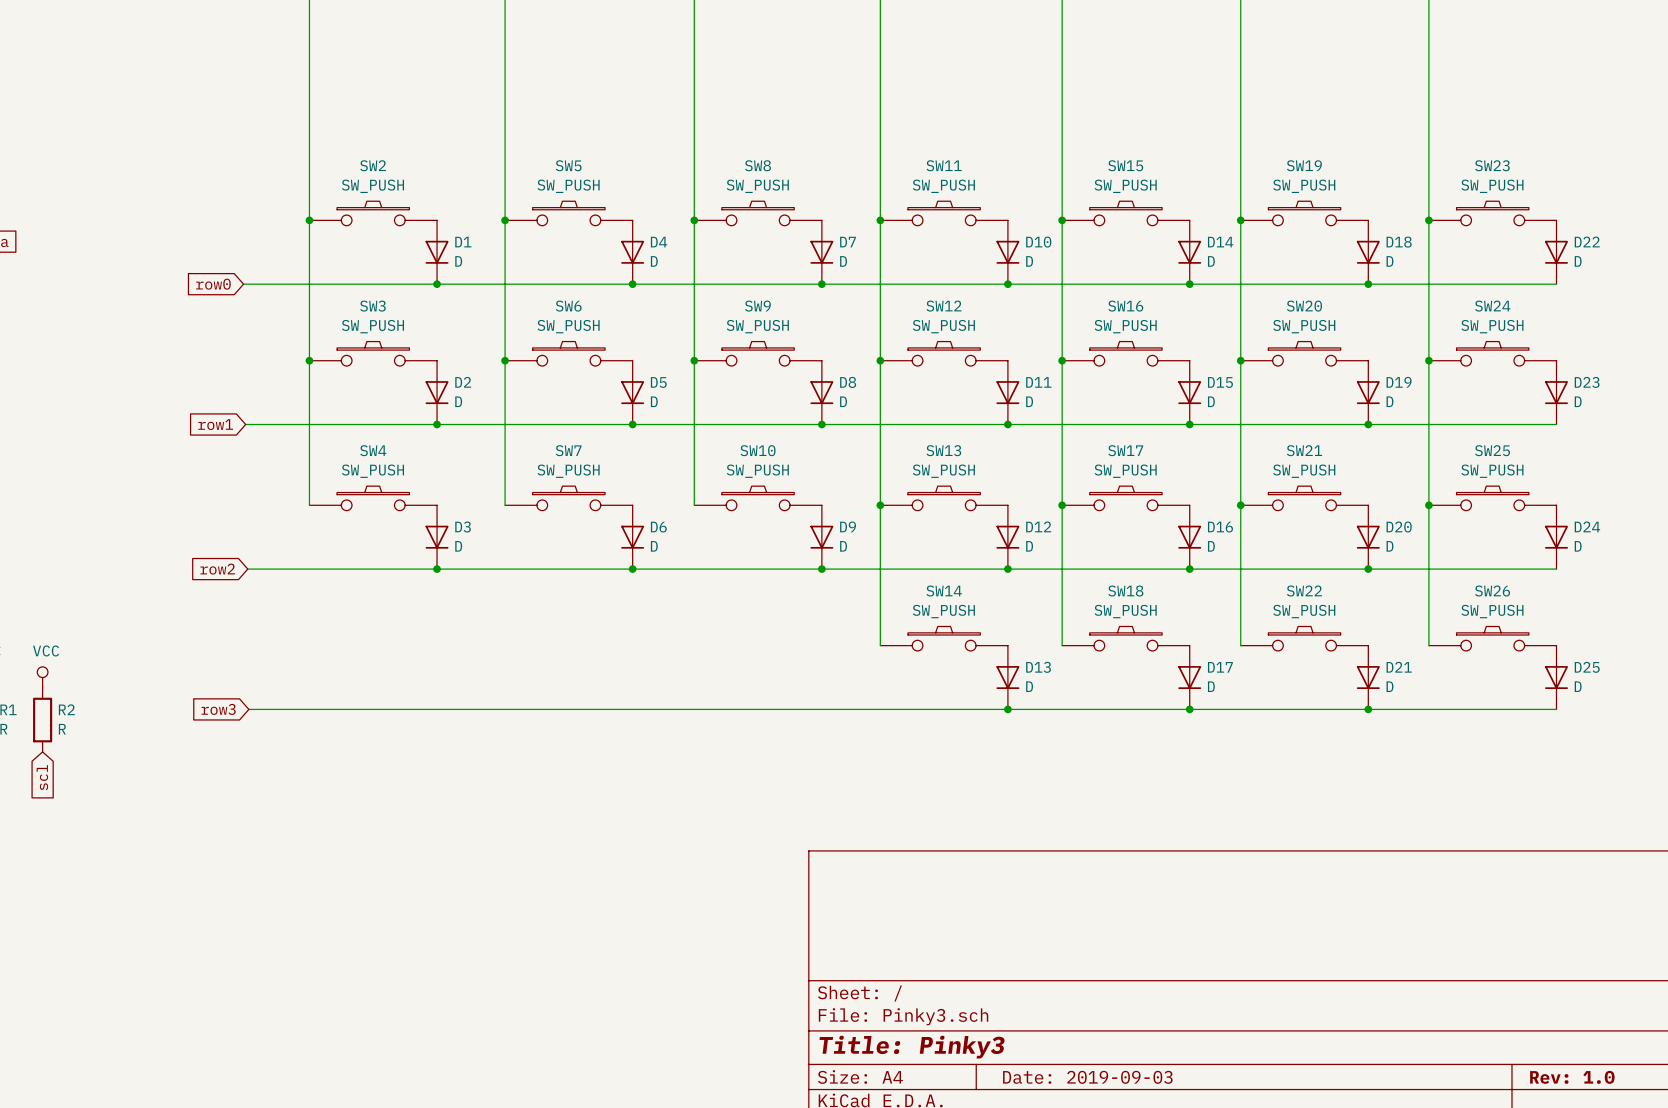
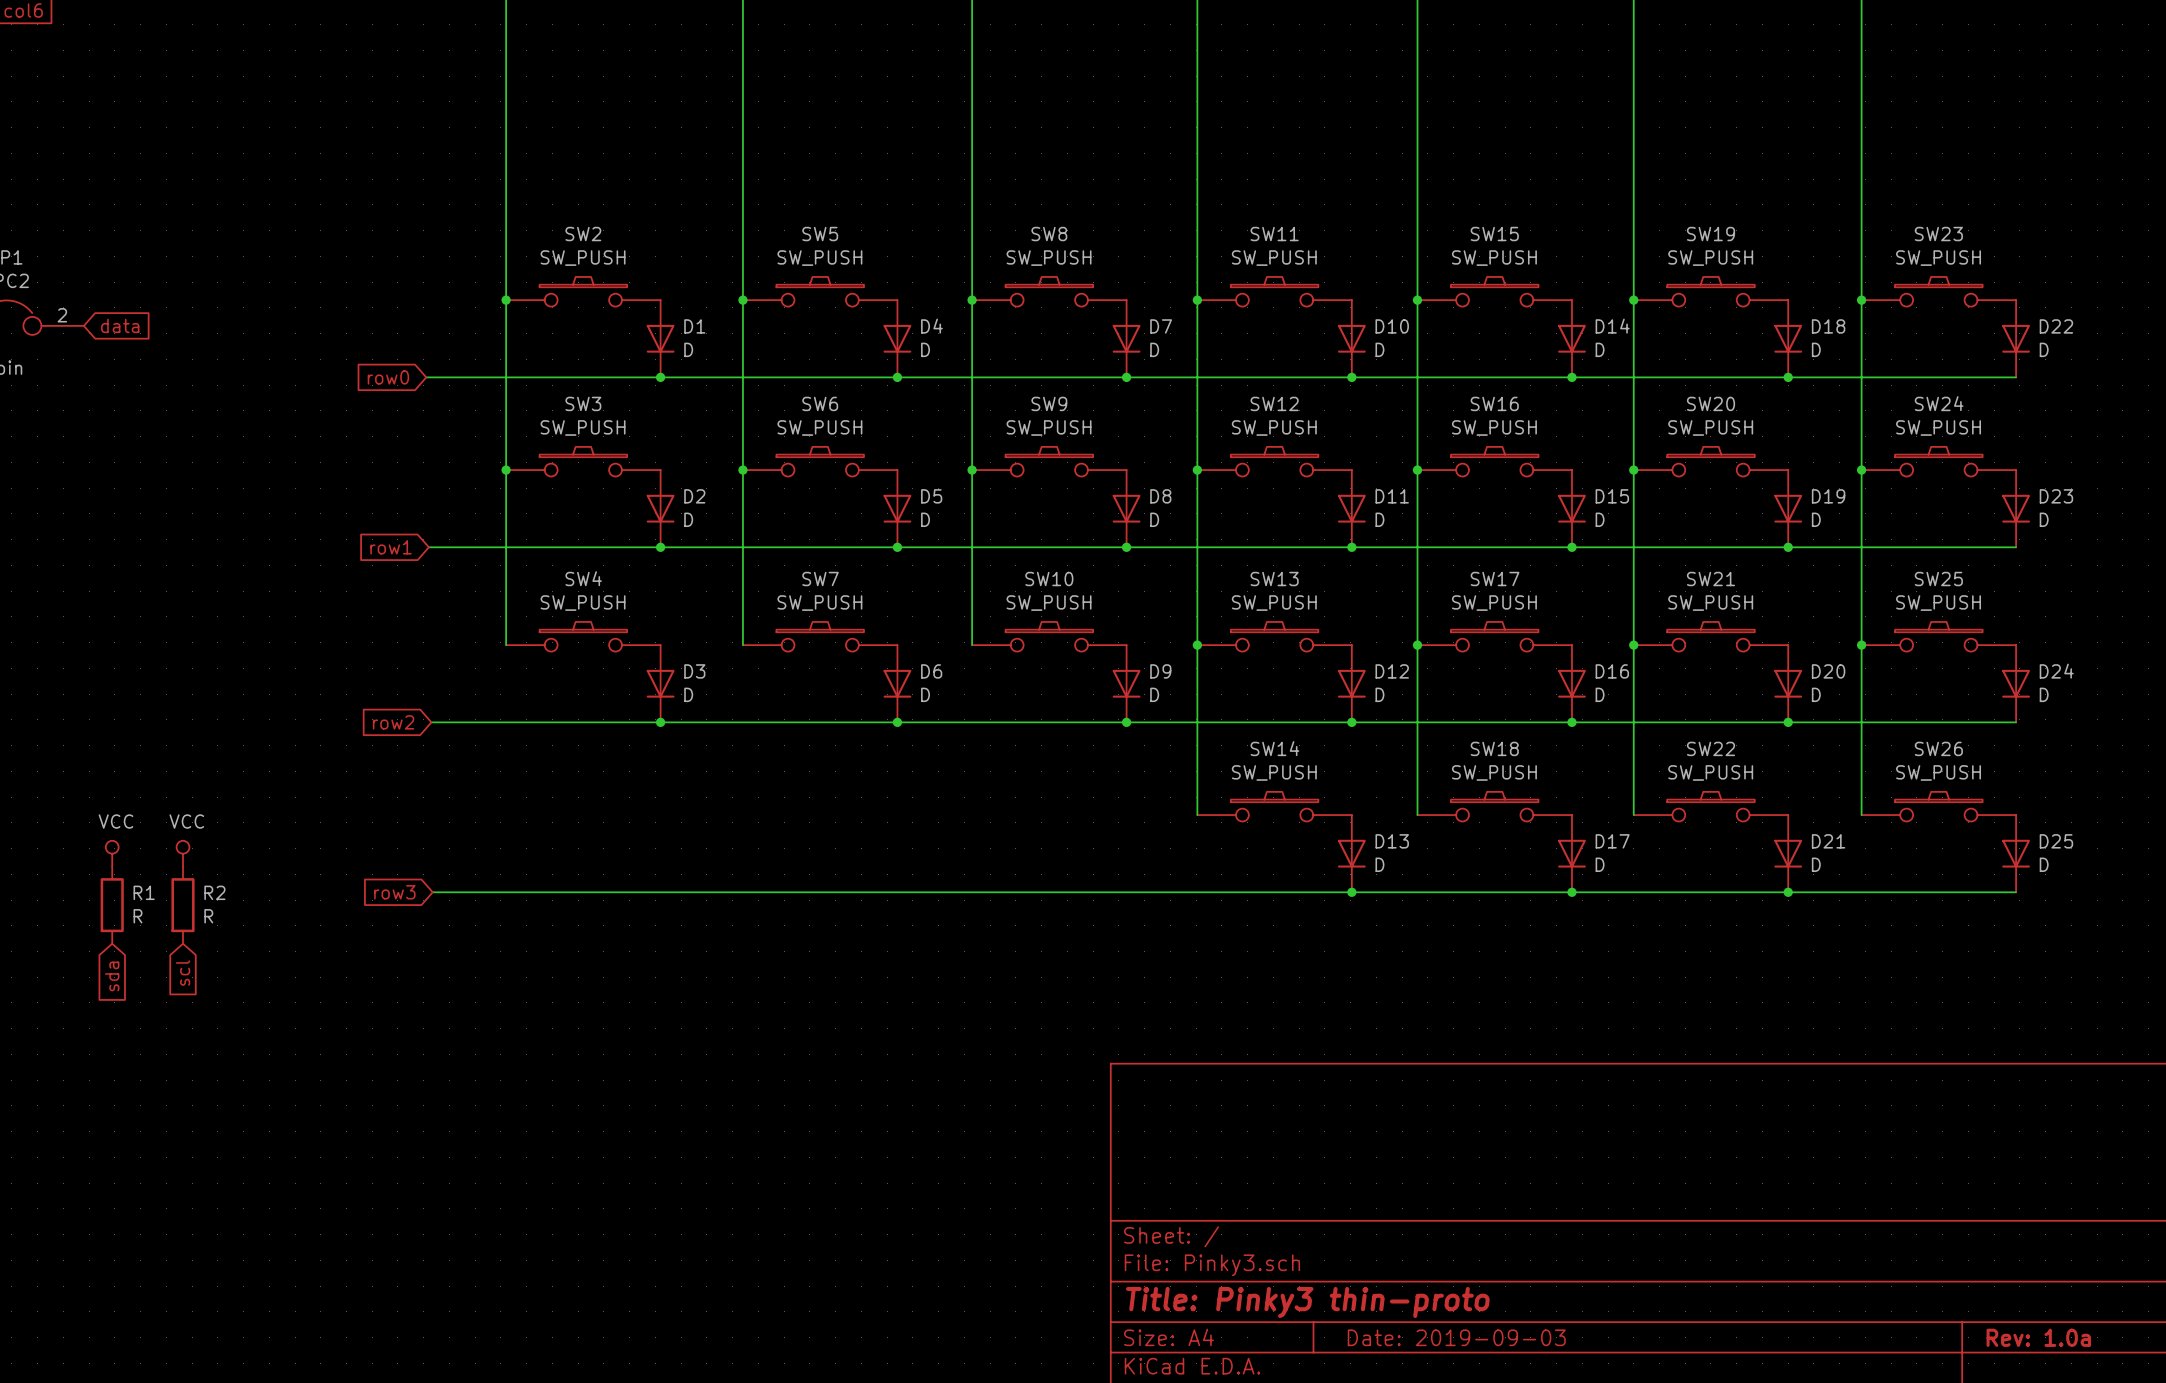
title block: Title: Pinky3 (912, 1047) -> Title: Pinky3 thin-proto (1307, 1302)
title block: Rev: 1.0 (1572, 1077) -> Rev: 1.0a (2038, 1337)

